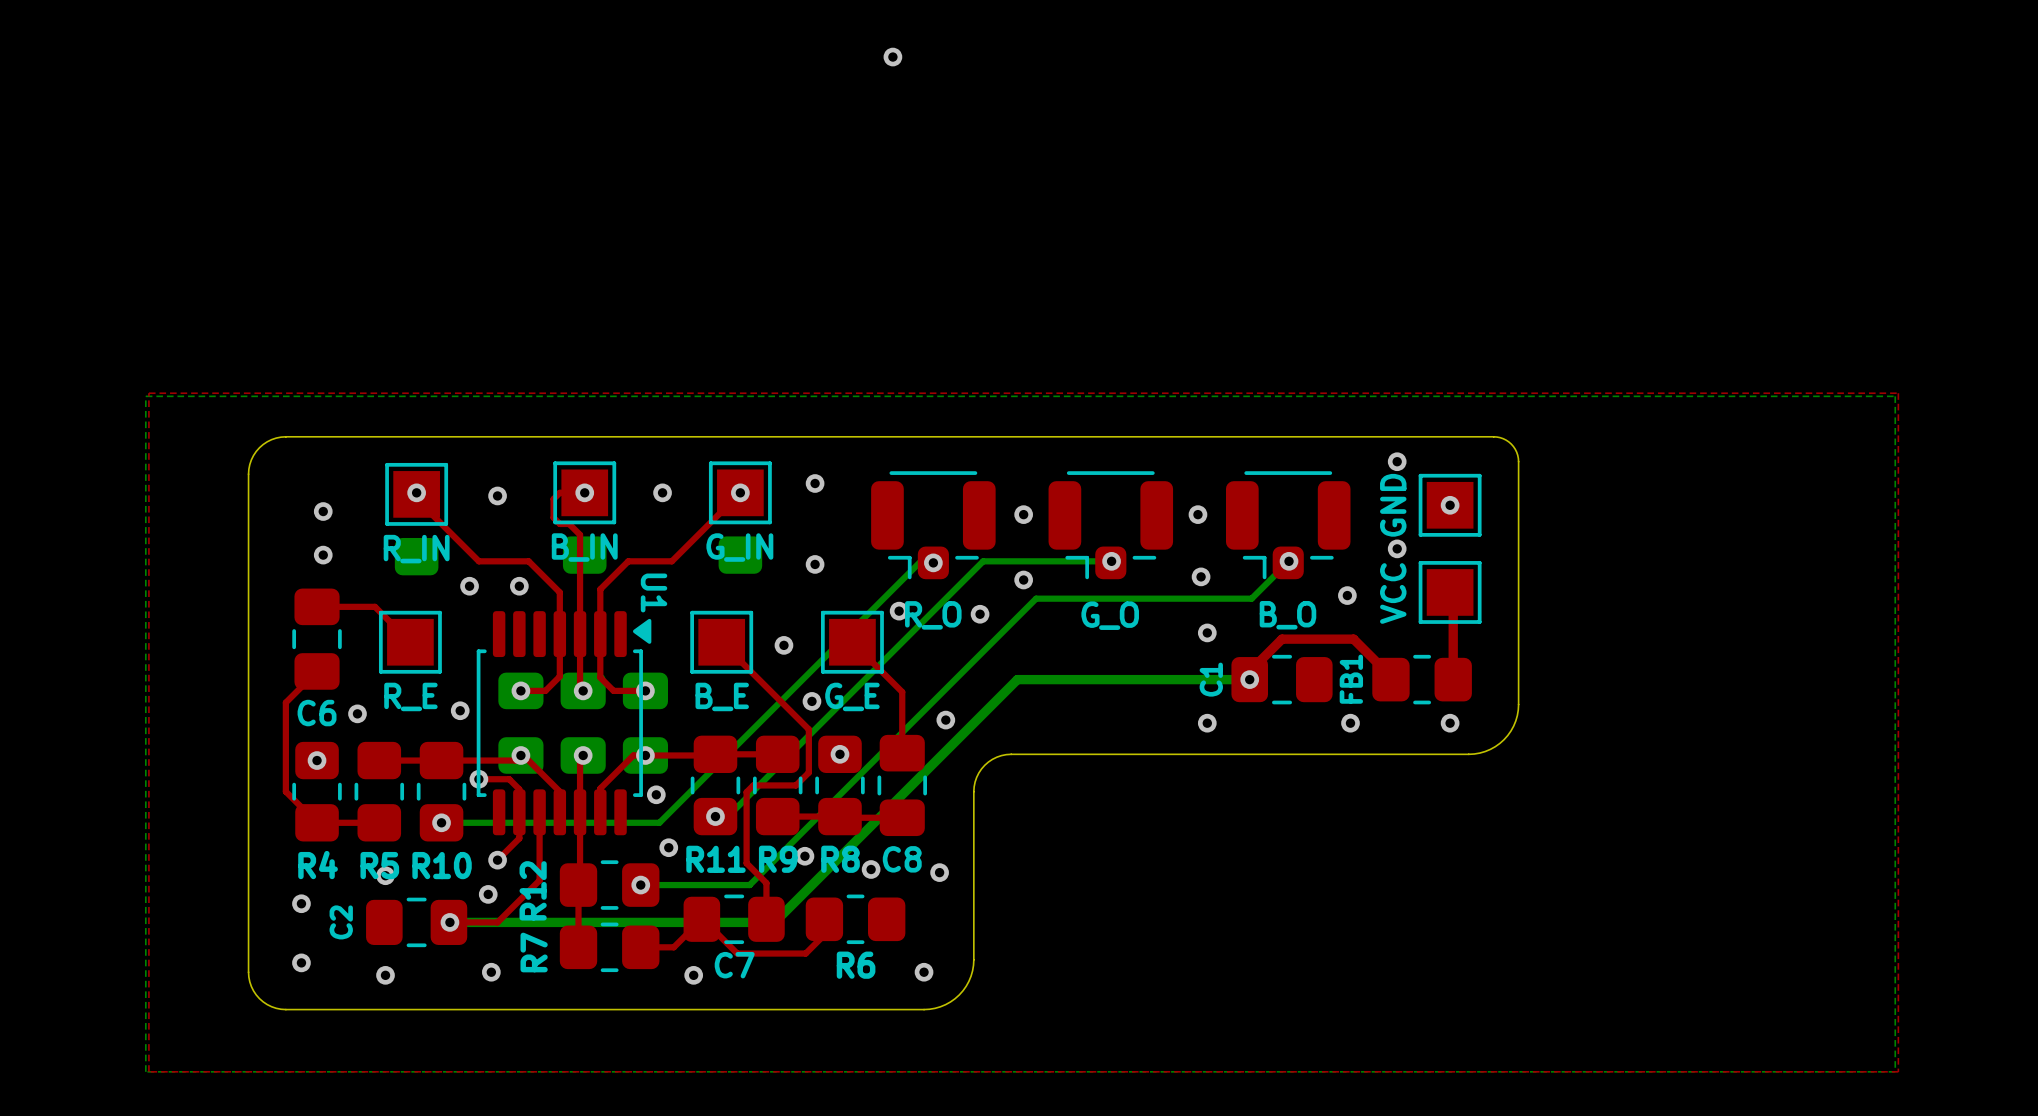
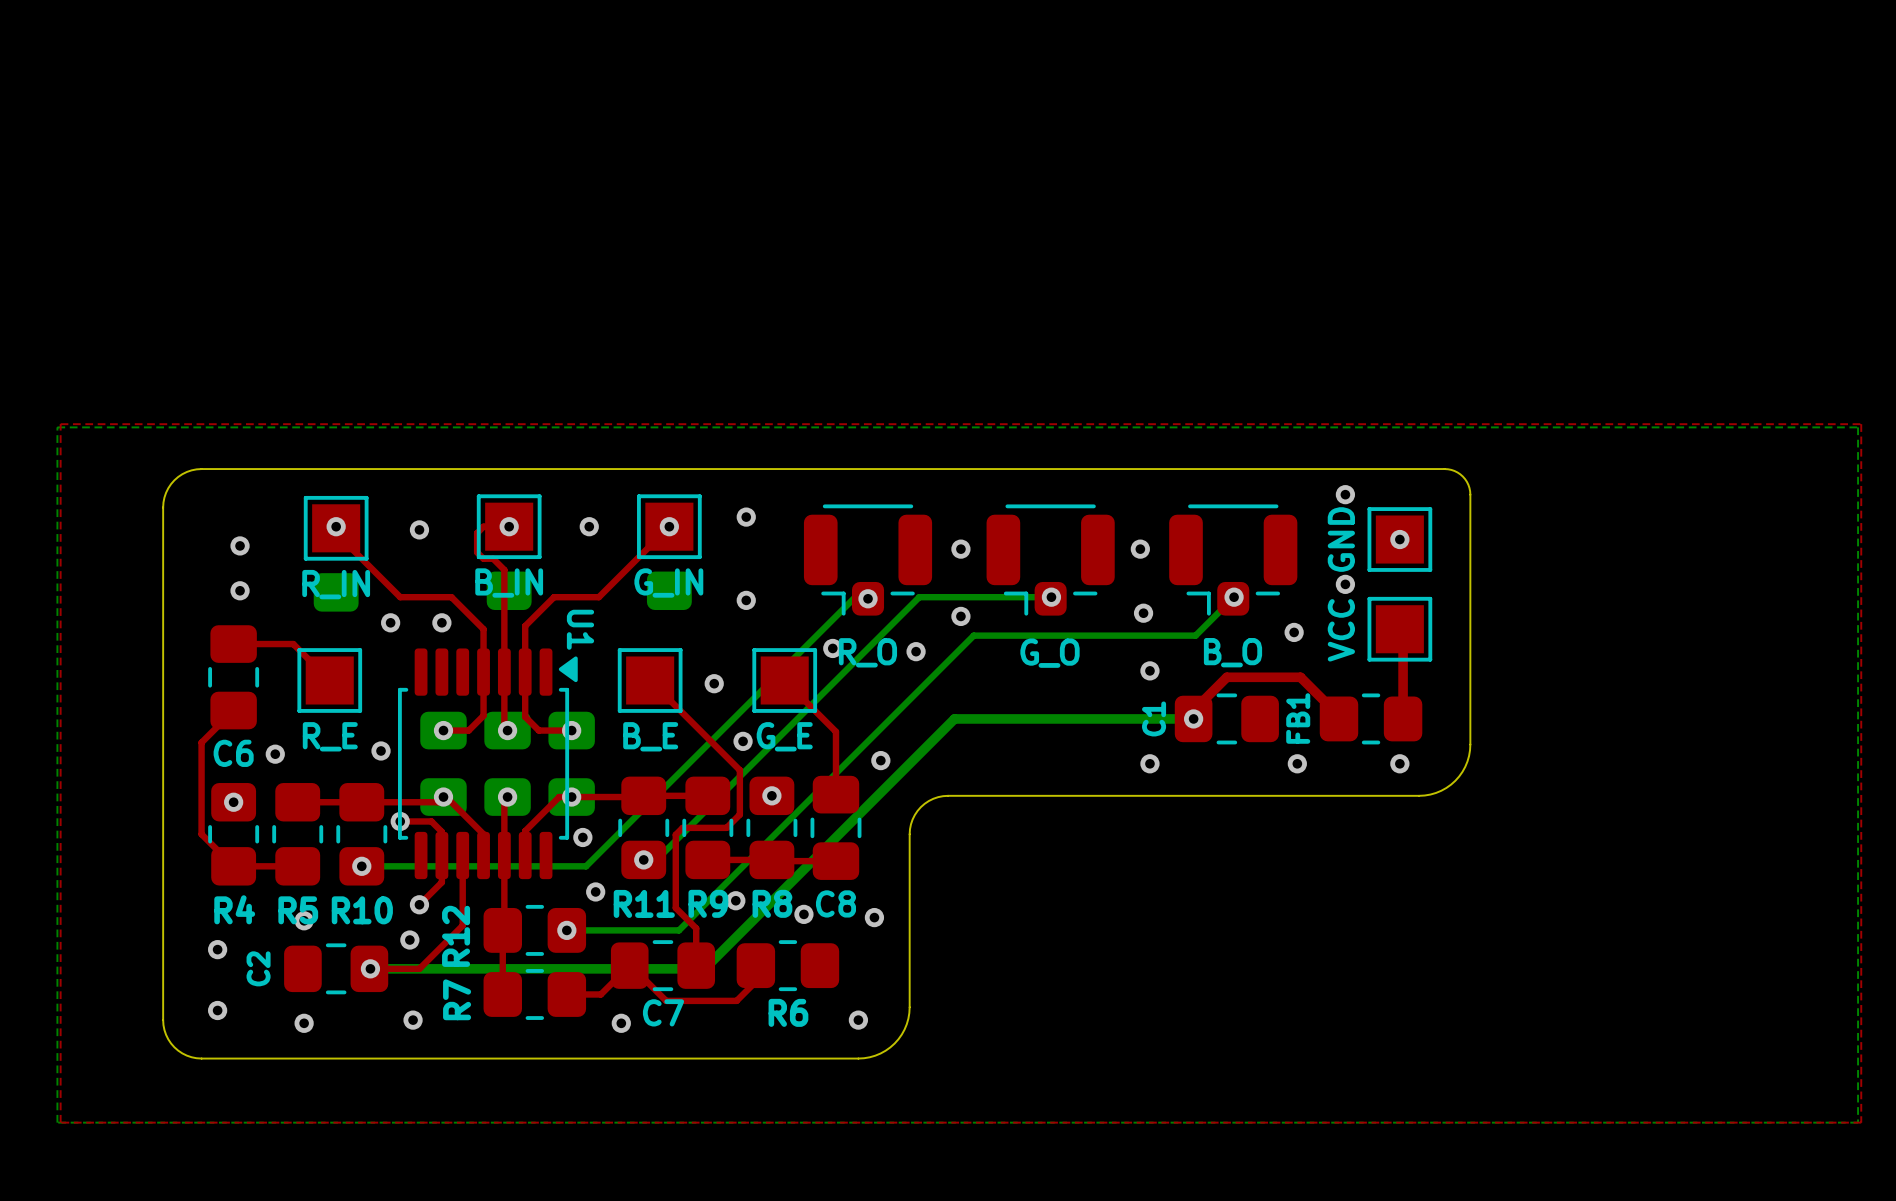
via: (892, 57) -> none

